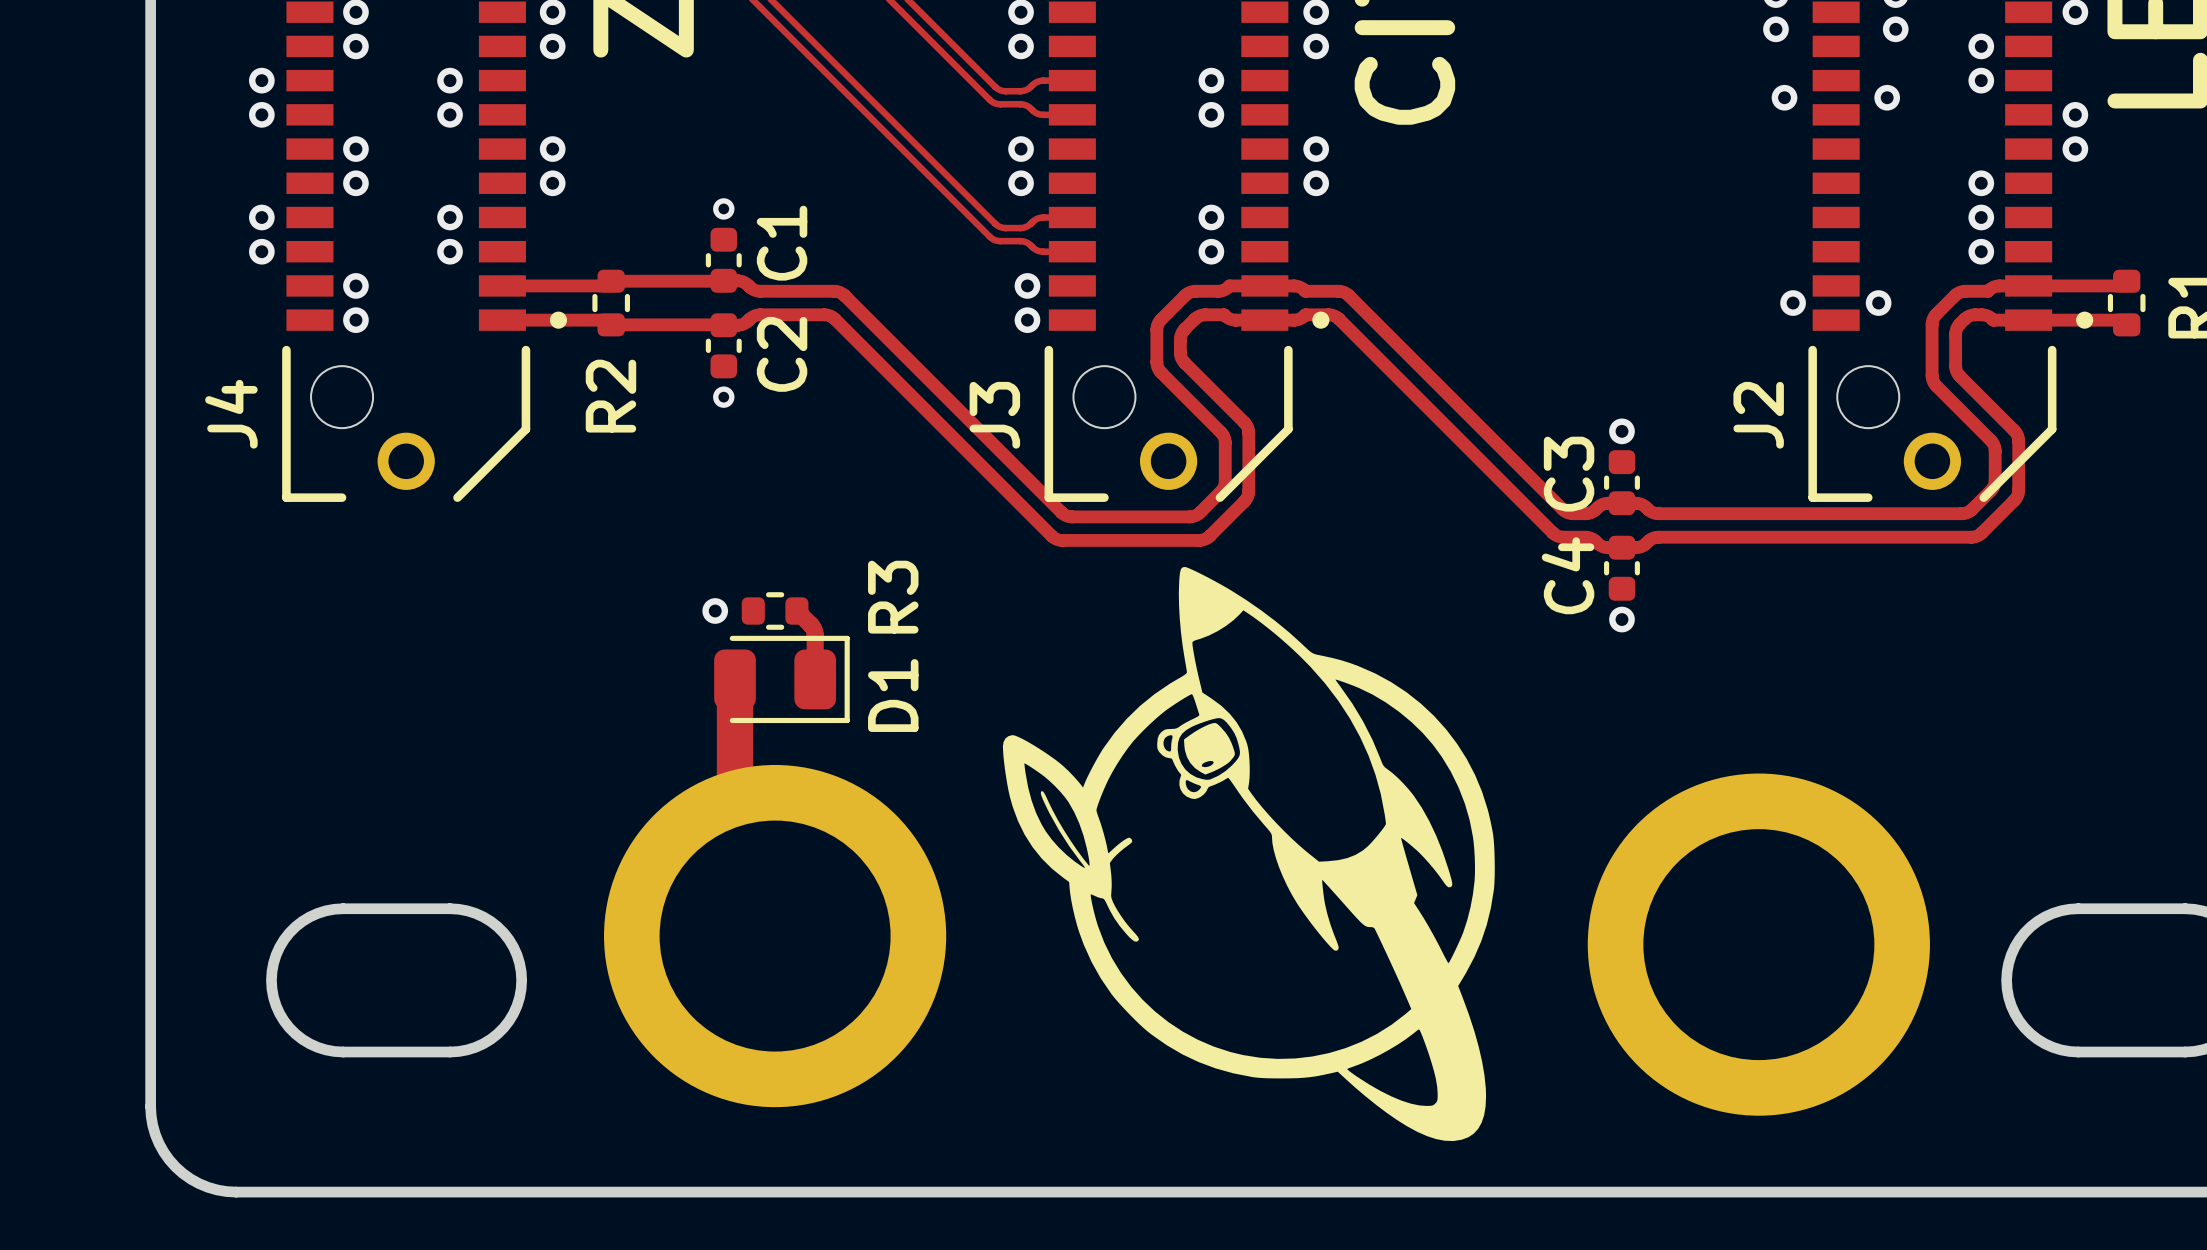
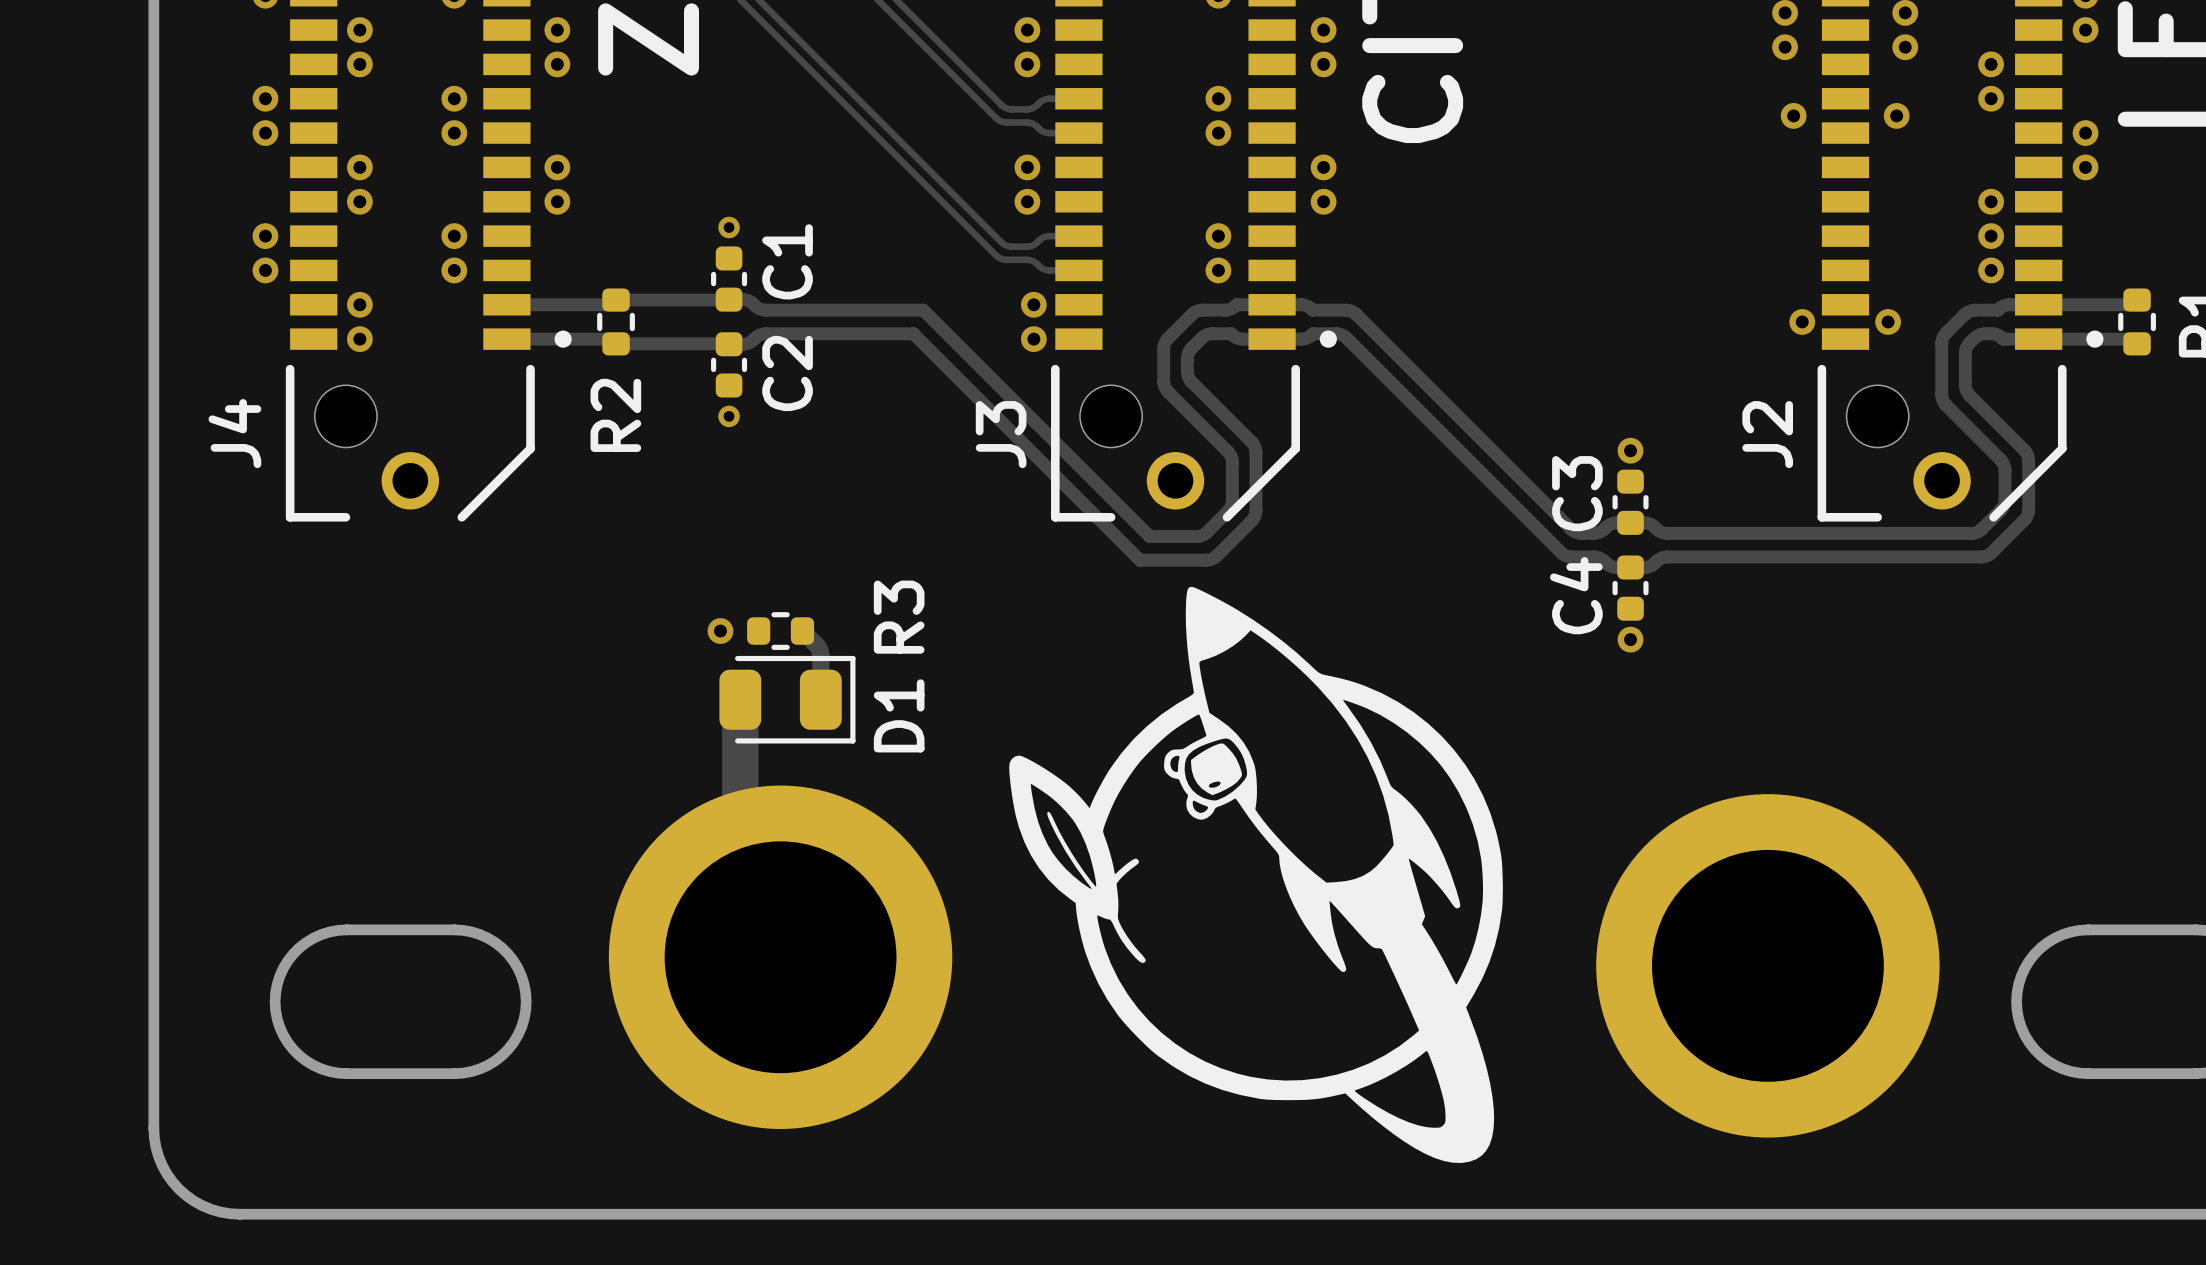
track: (834, 291) (844, 295) (1063, 513) (1072, 516) (1142, 516) -> (839, 310) (923, 310) (1149, 536)
track: (824, 314) (834, 319) (1054, 537) (1062, 540) (1133, 540) -> (830, 333) (913, 333) (1139, 560)

